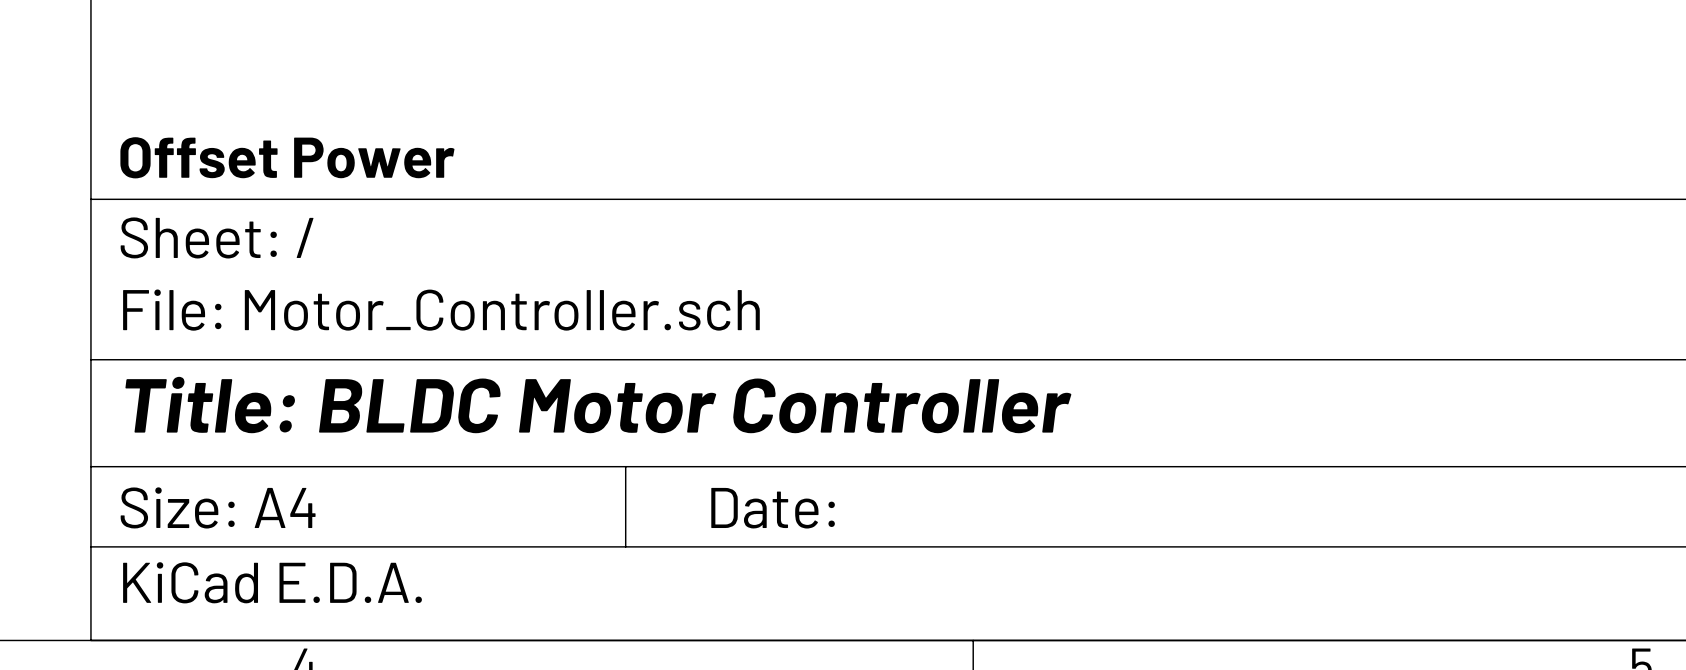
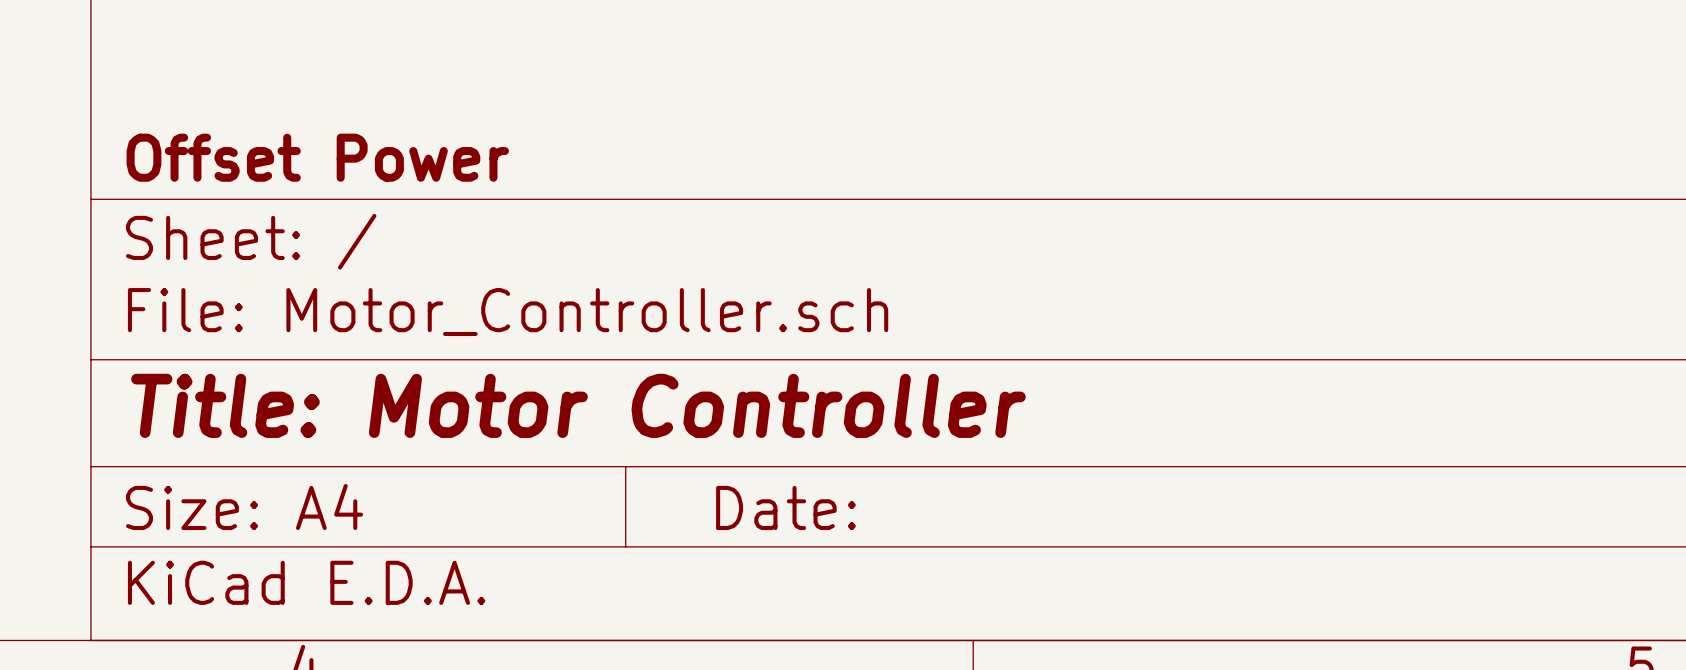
title block: Title: BLDC Motor Controller (598, 405) -> Title: Motor Controller (578, 405)

